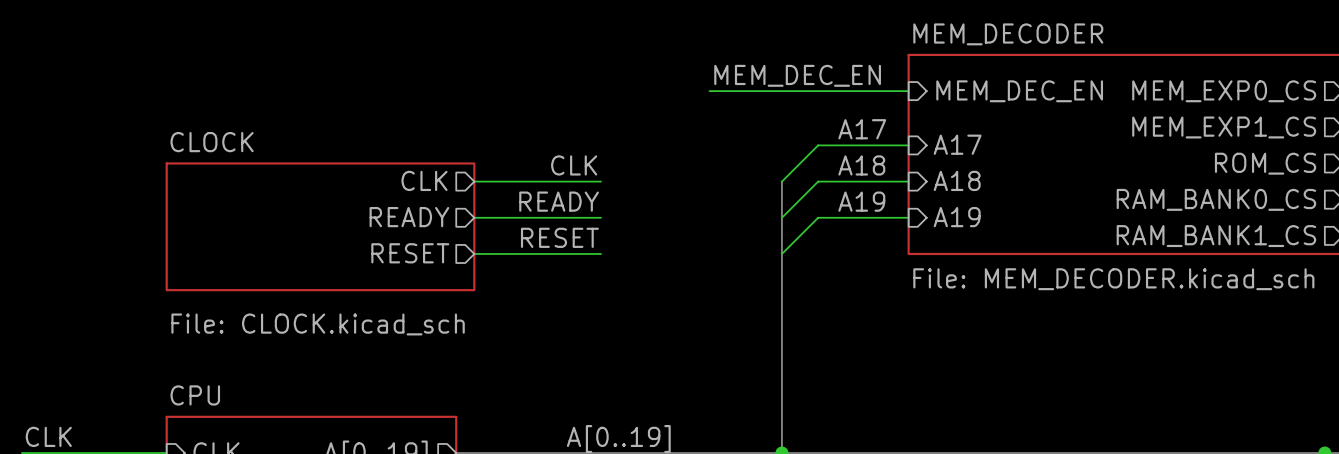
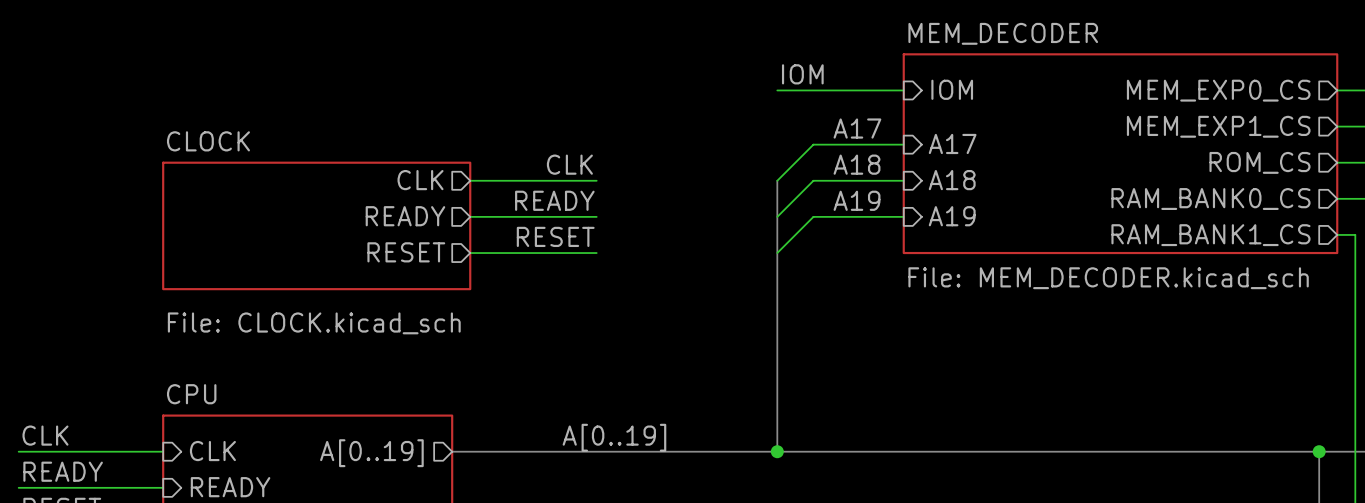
label: none -> IOM (802, 74)
label: MEM_DEC_EN (797, 75) -> none
wire: (709, 91) (781, 91) -> none
sheet pin: MEM_DEC_EN (1019, 91) -> IOM (952, 89)

